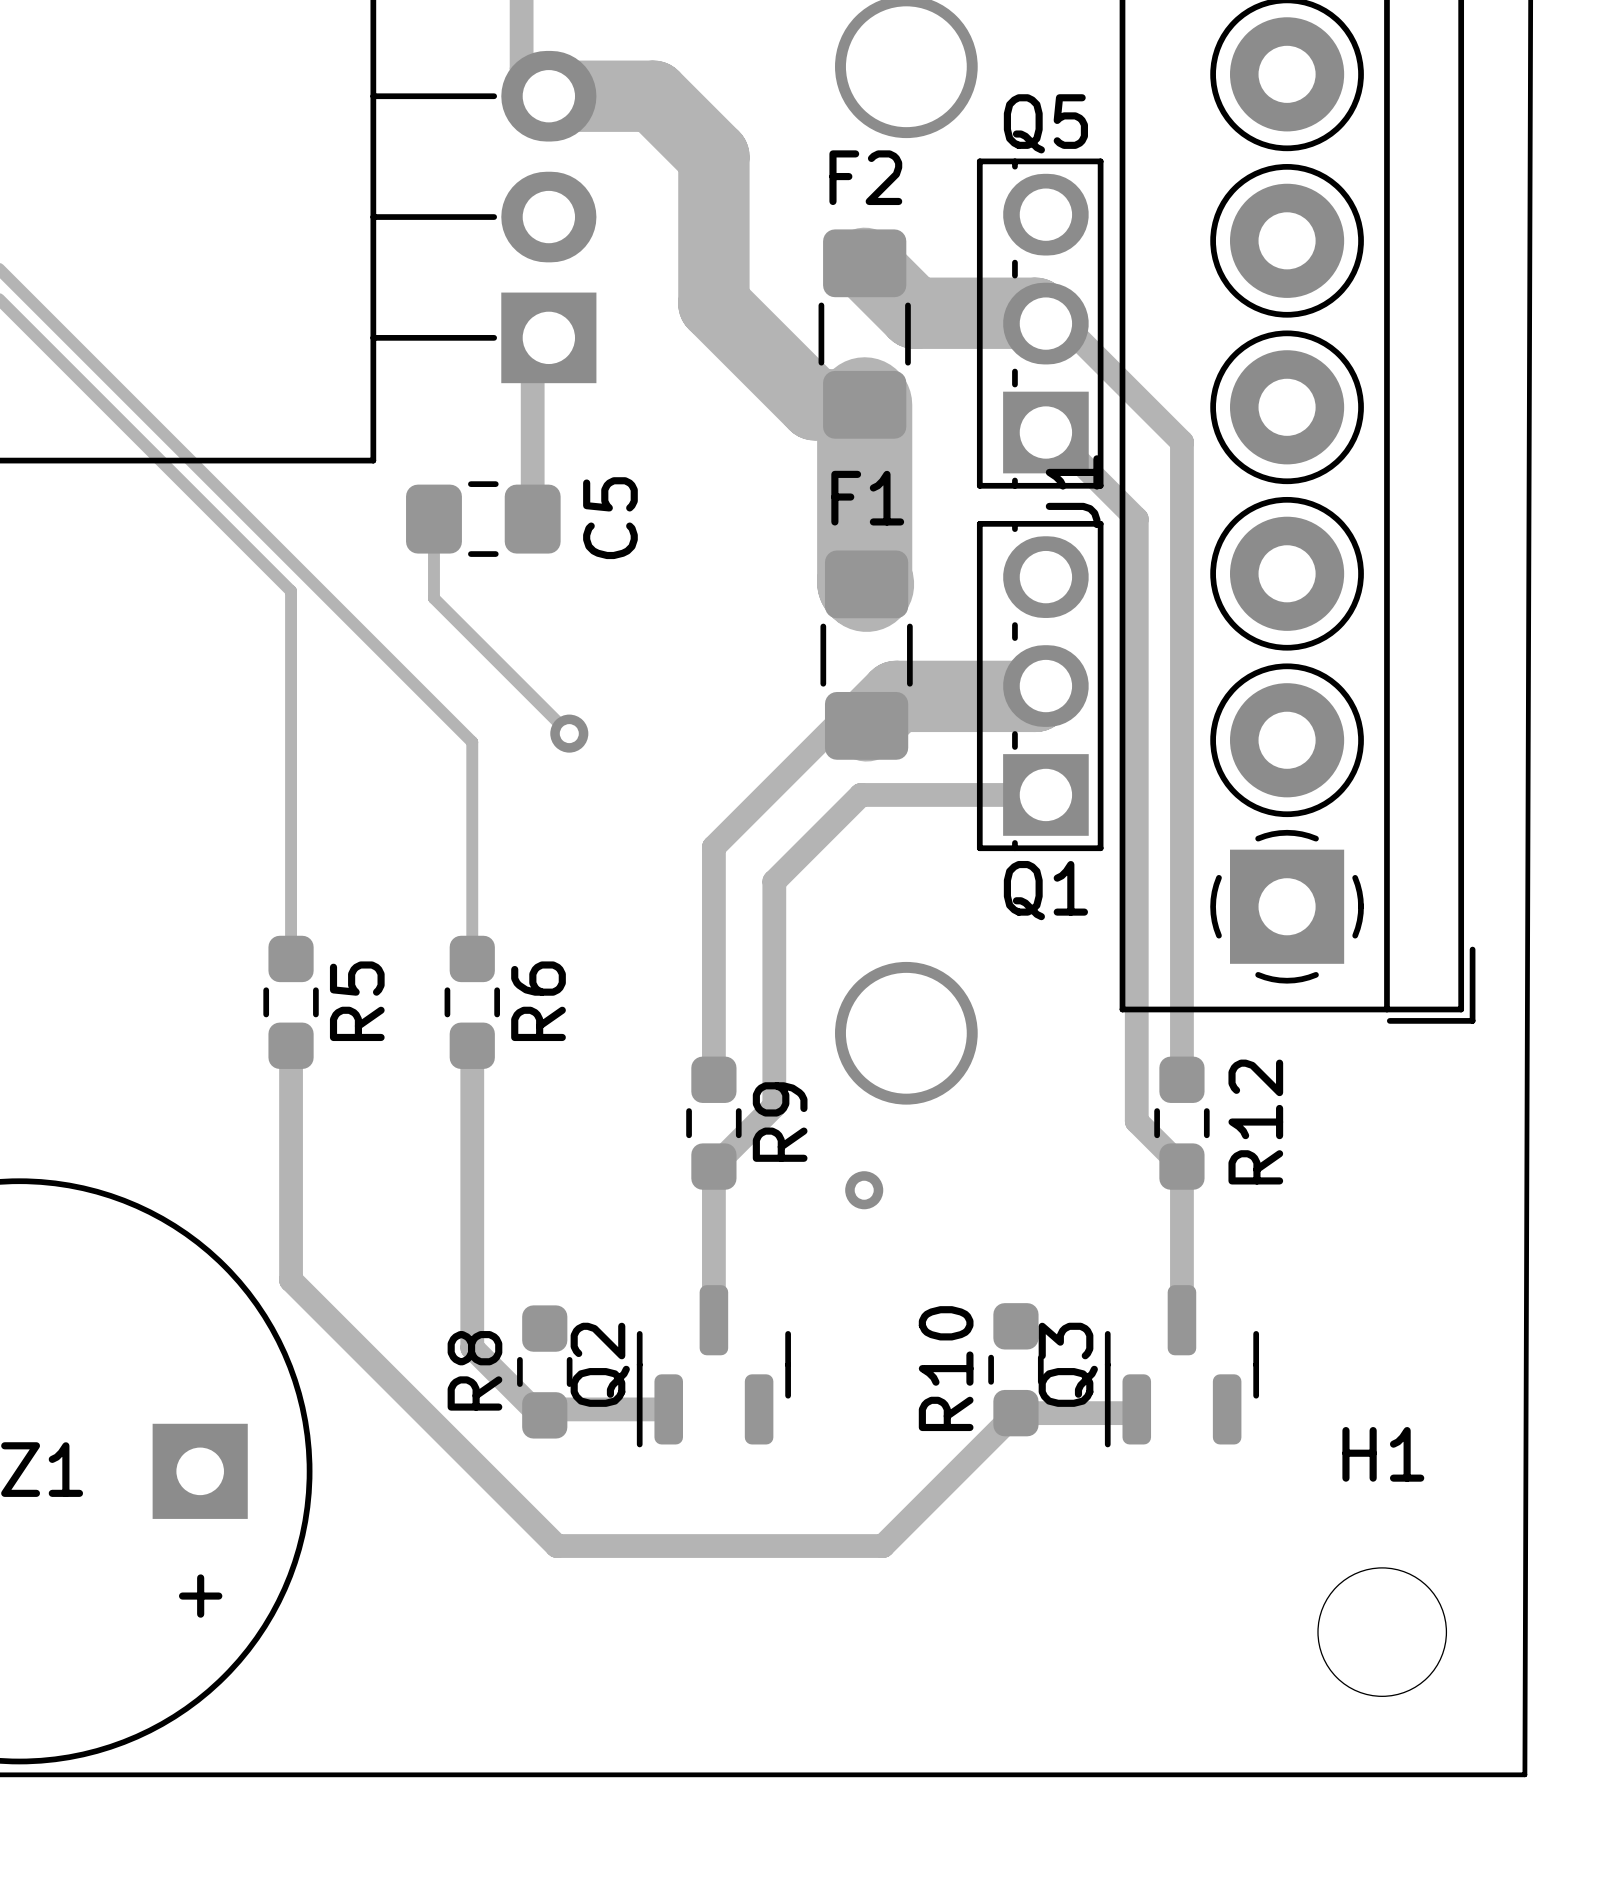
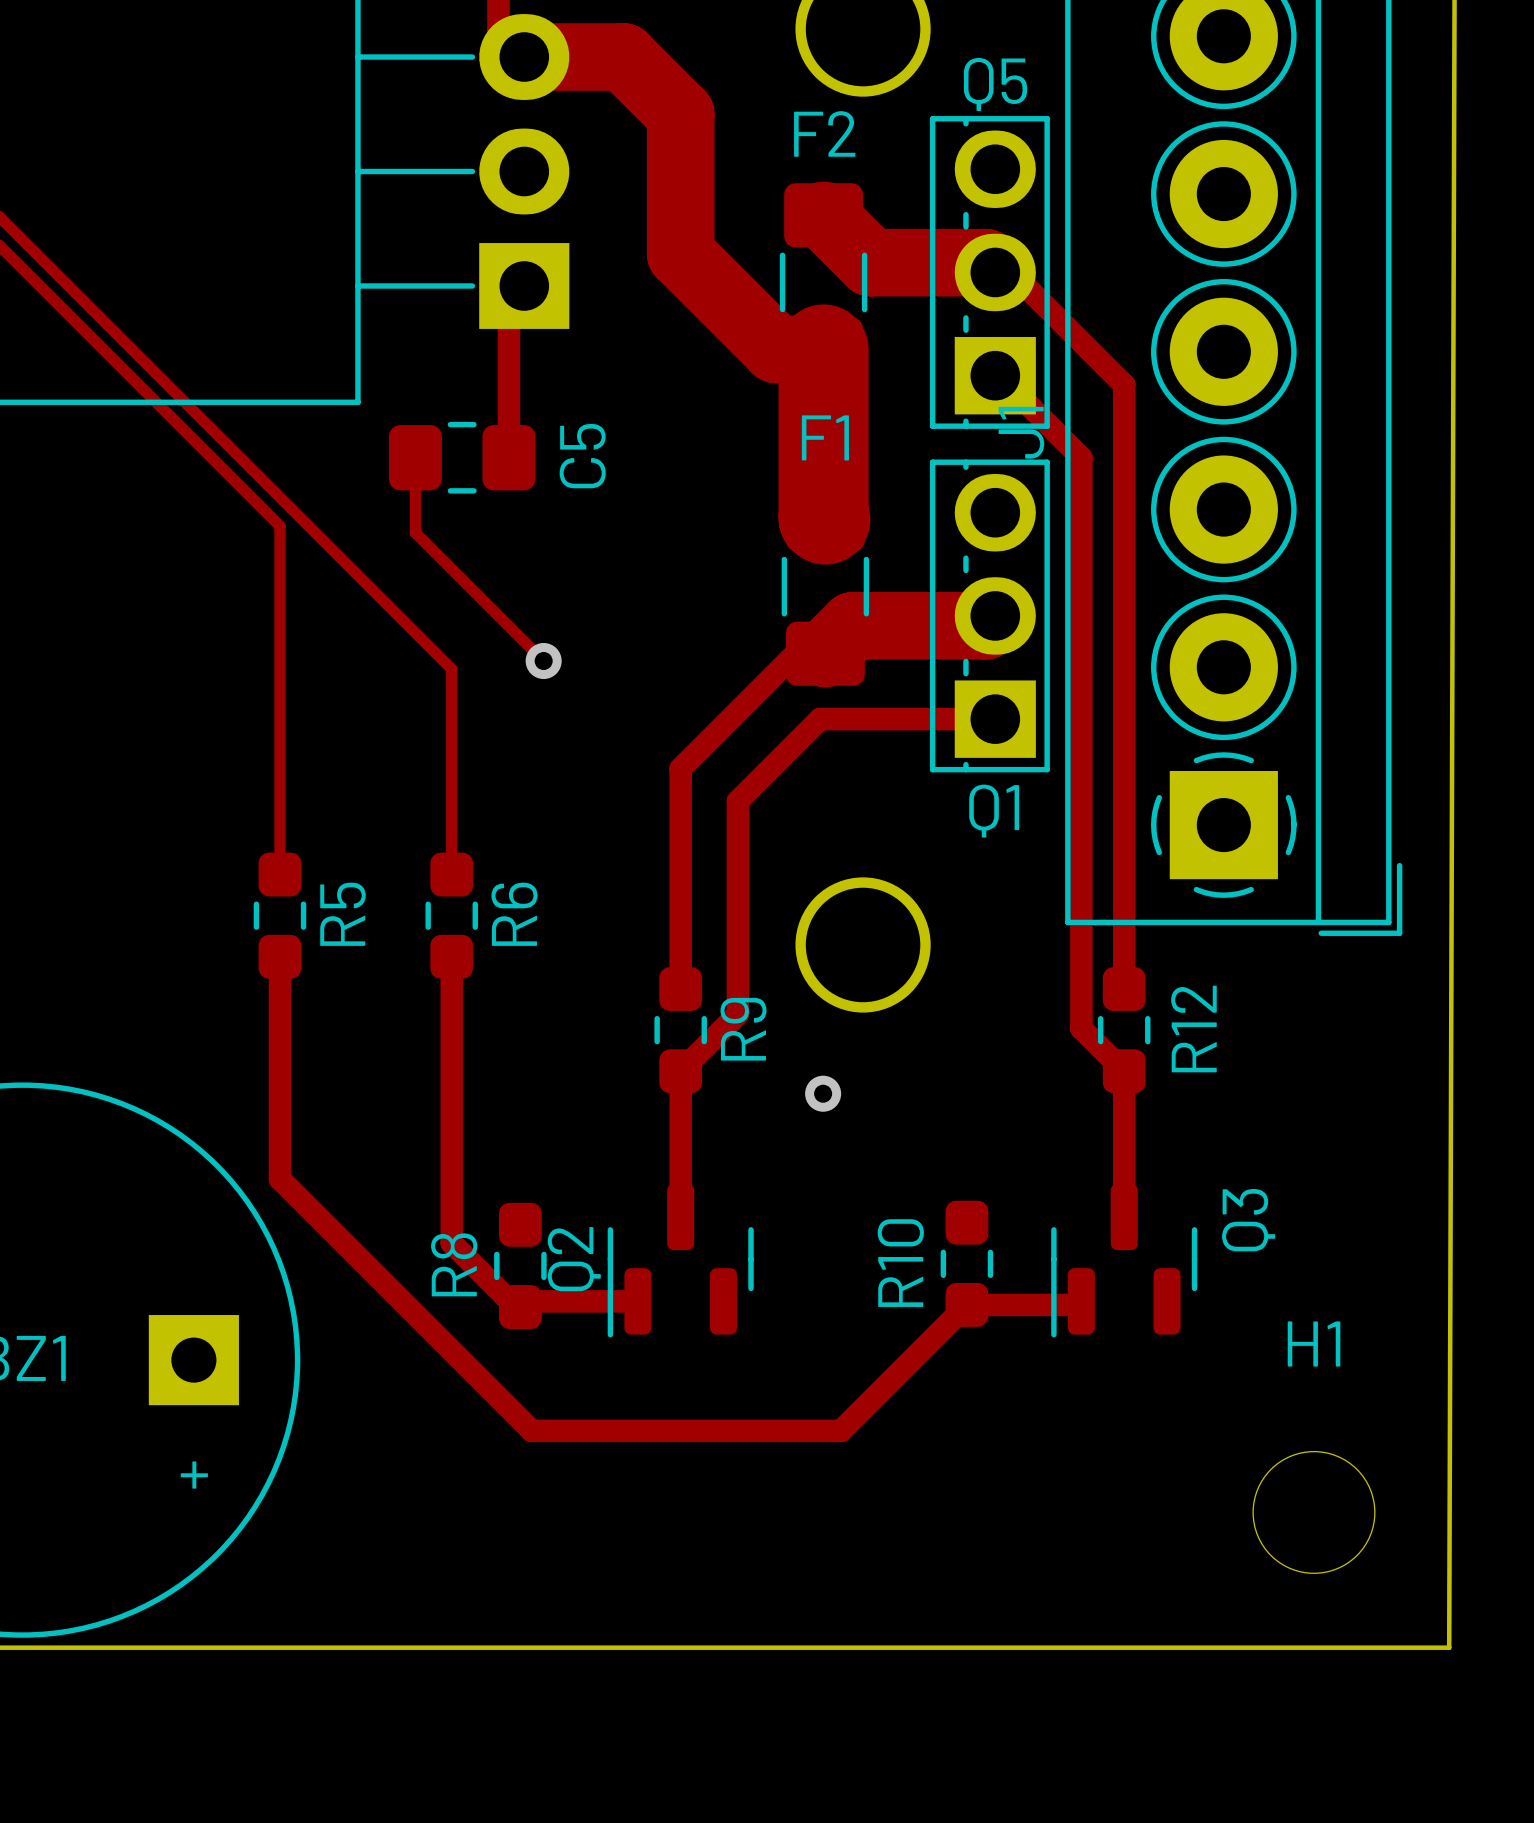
Q3 name position: Q3 (1068, 1364) -> Q3 (1248, 1220)

